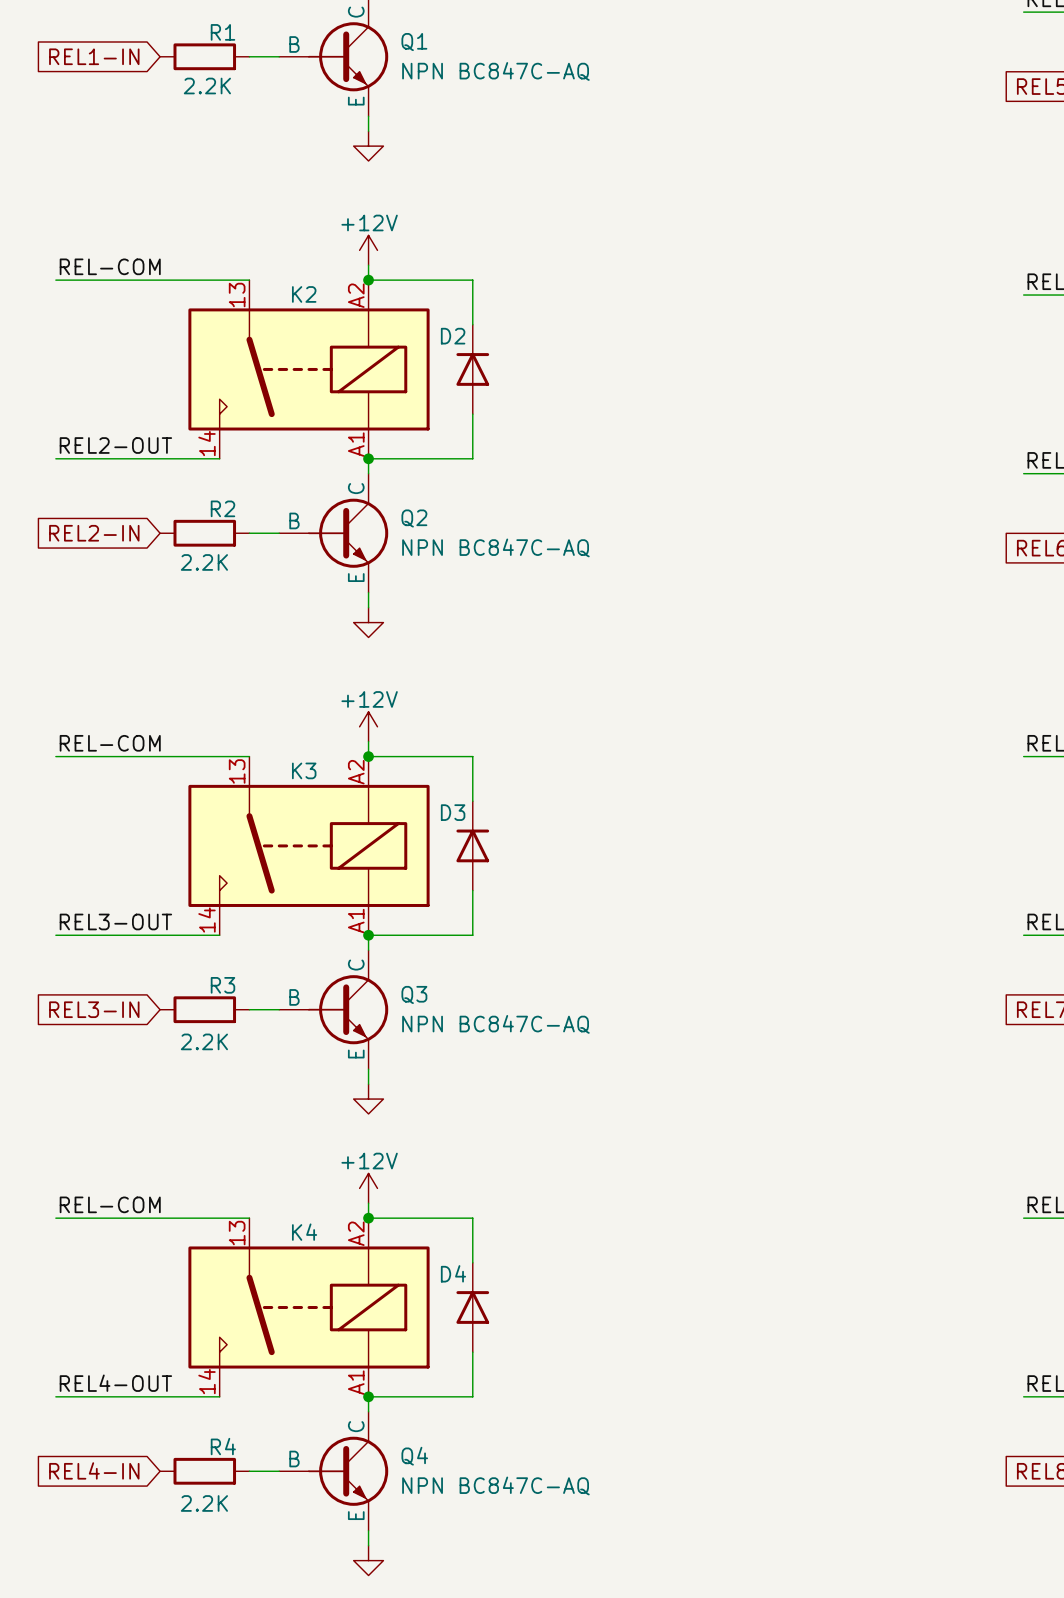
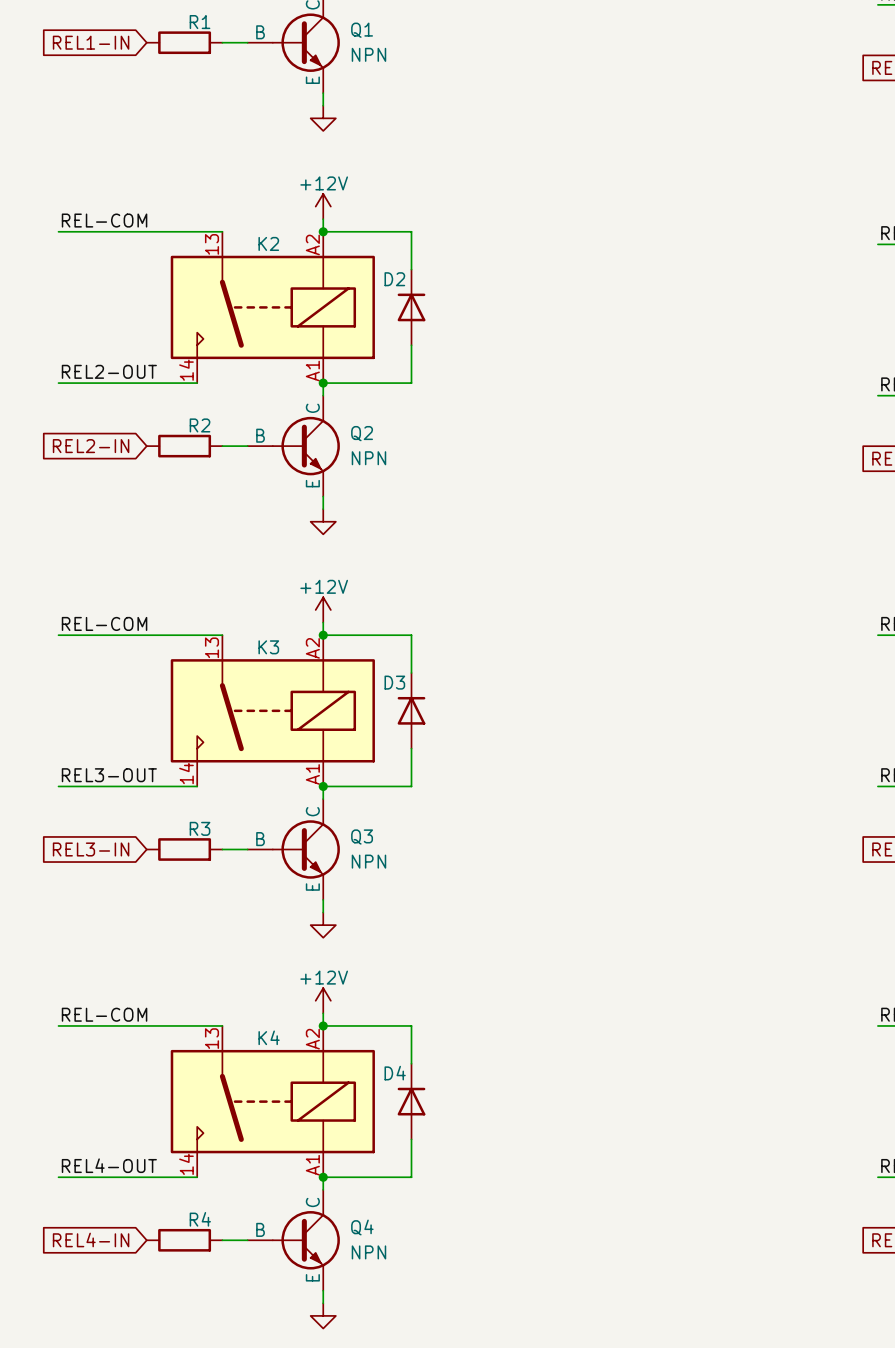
Q1 value: NPN BC847C-AQ (495, 71) -> NPN (368, 54)
R1 value: 2.2K (207, 86) -> none
Q2 value: NPN BC847C-AQ (495, 547) -> NPN (368, 458)
R2 value: 2.2K (204, 562) -> none
Q3 value: NPN BC847C-AQ (495, 1024) -> NPN (368, 861)
R3 value: 2.2K (204, 1041) -> none
Q4 value: NPN BC847C-AQ (495, 1485) -> NPN (368, 1252)
R4 value: 2.2K (204, 1503) -> none

